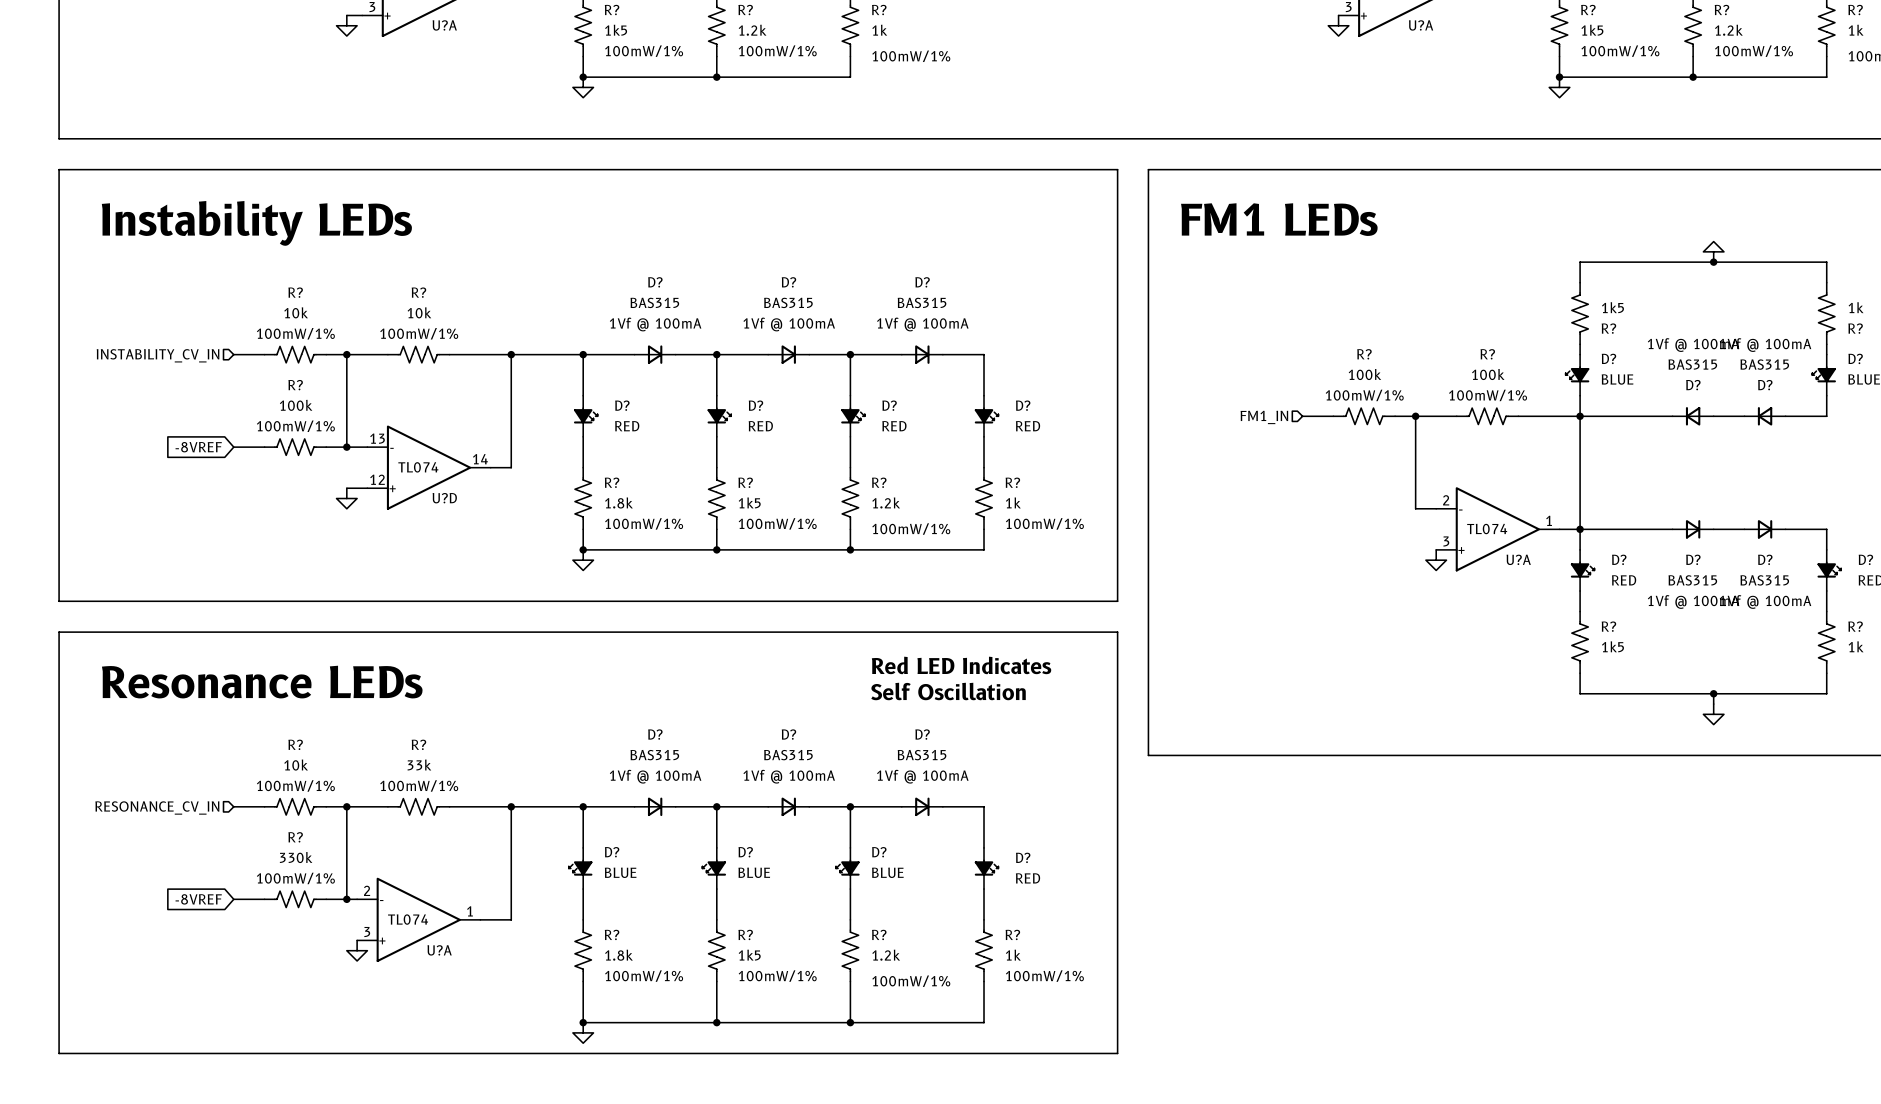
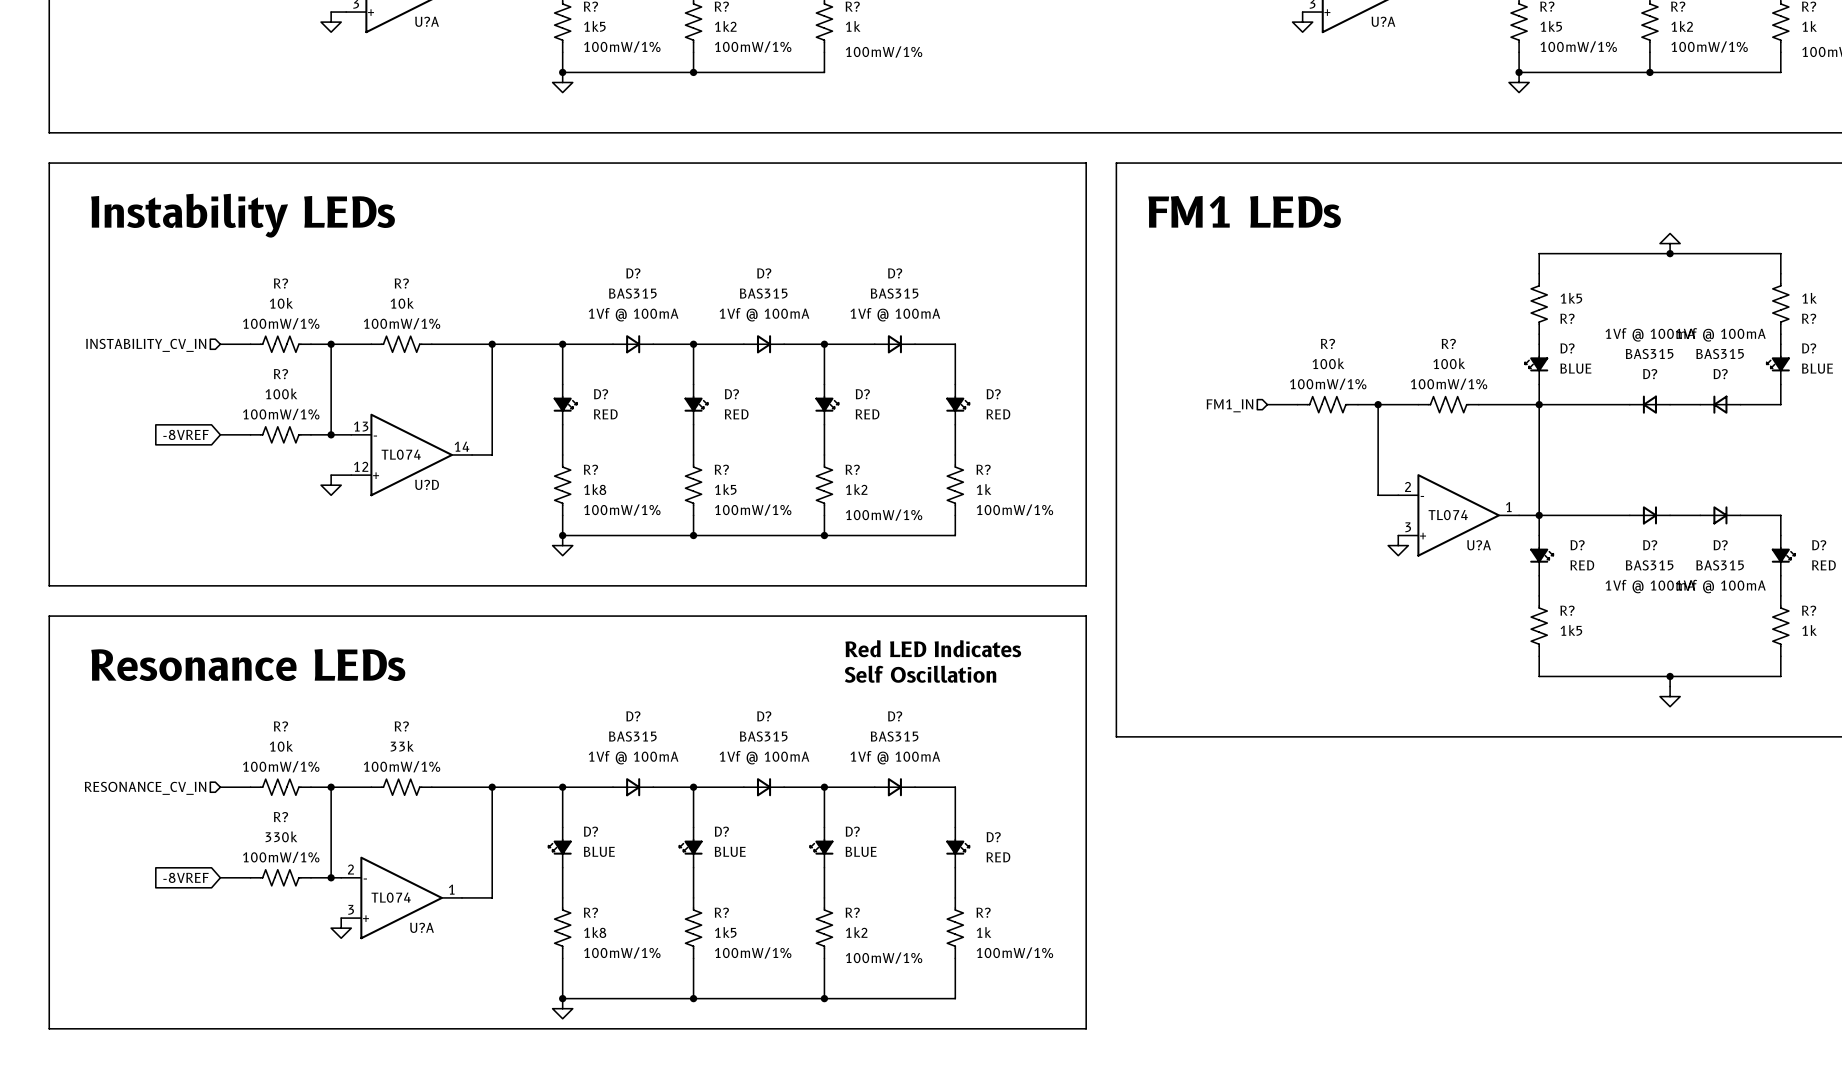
R? value: 1.2k (752, 30) -> 1k2 (725, 26)
R? value: 1.2k (1728, 30) -> 1k2 (1682, 26)
R? value: 1.8k (618, 502) -> 1k8 (595, 489)
R? value: 1.2k (886, 502) -> 1k2 (856, 489)
R? value: 1.8k (618, 955) -> 1k8 (595, 932)
R? value: 1.2k (886, 955) -> 1k2 (856, 932)

